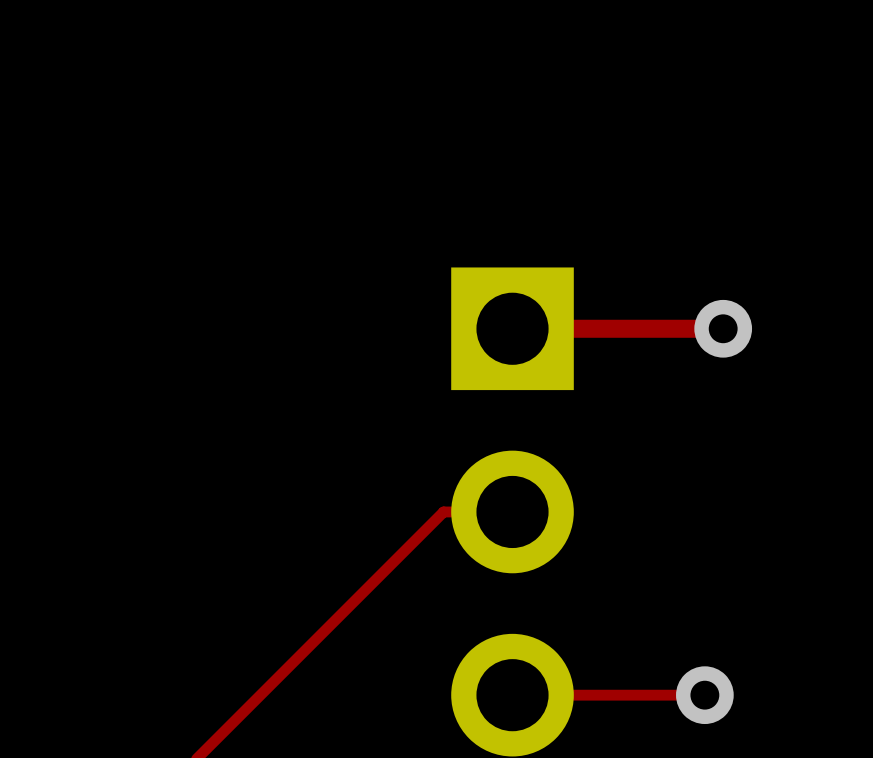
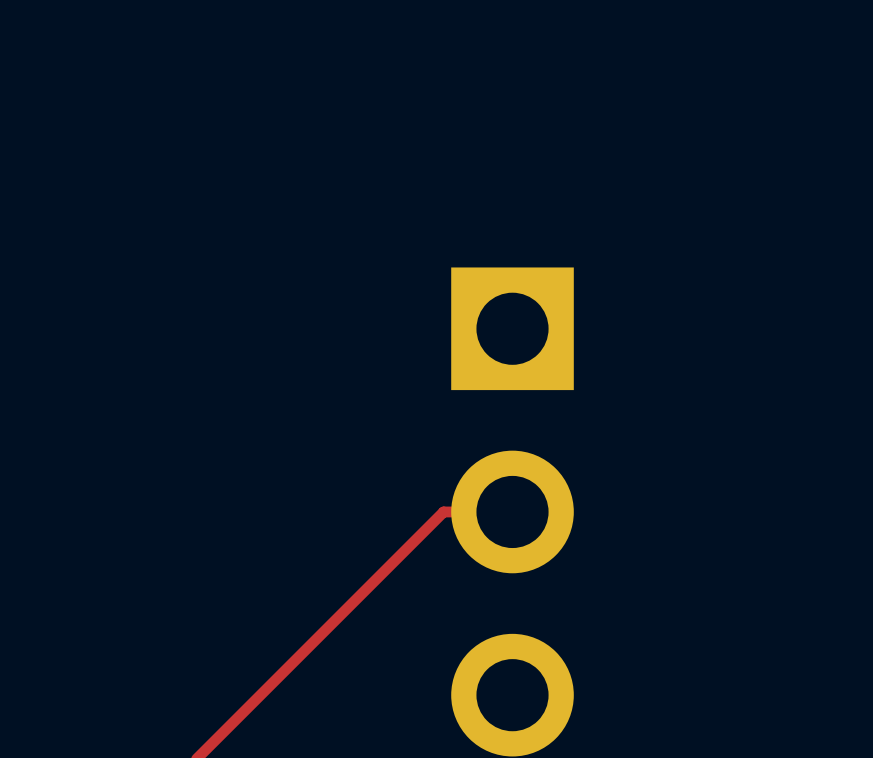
top track: (723, 328) (512, 328) -> none
via: (723, 328) -> none
top track: (704, 695) (512, 695) -> none
via: (704, 695) -> none

